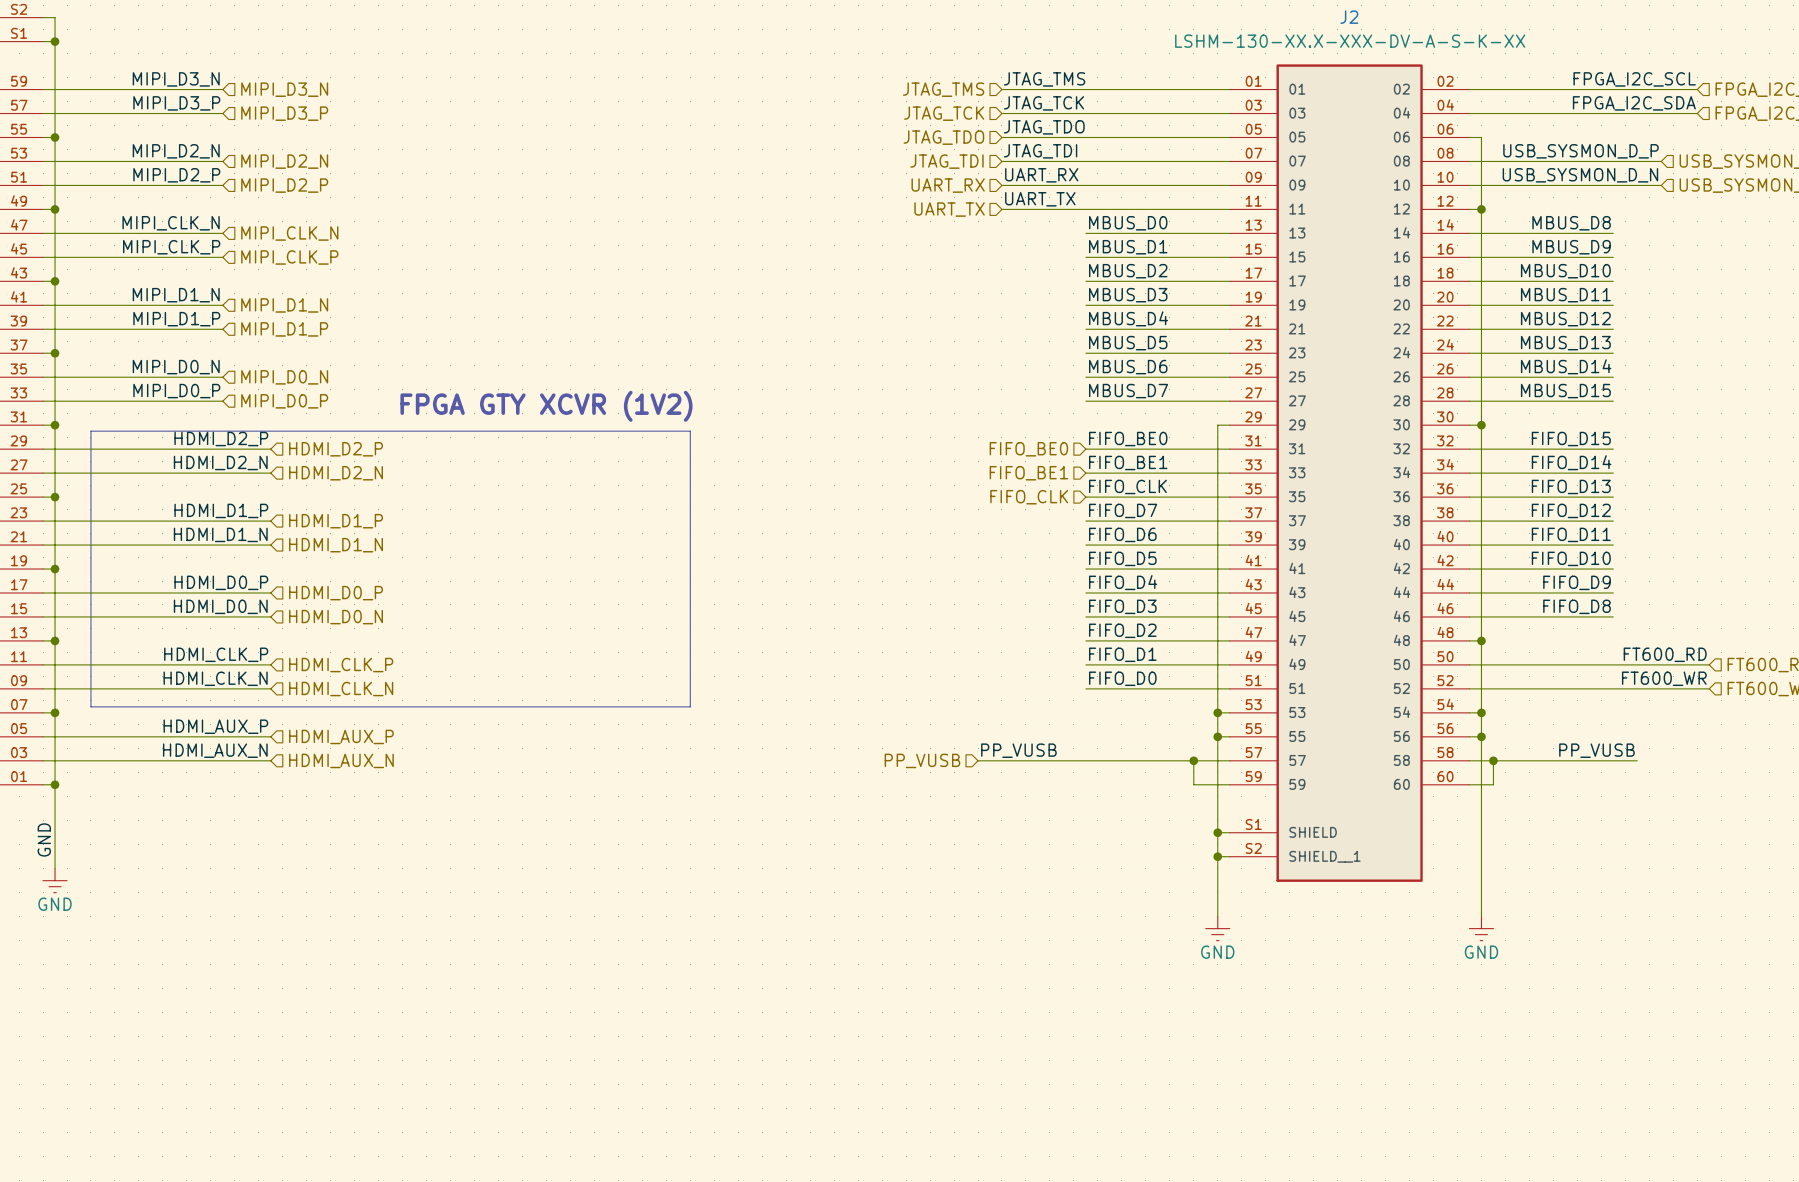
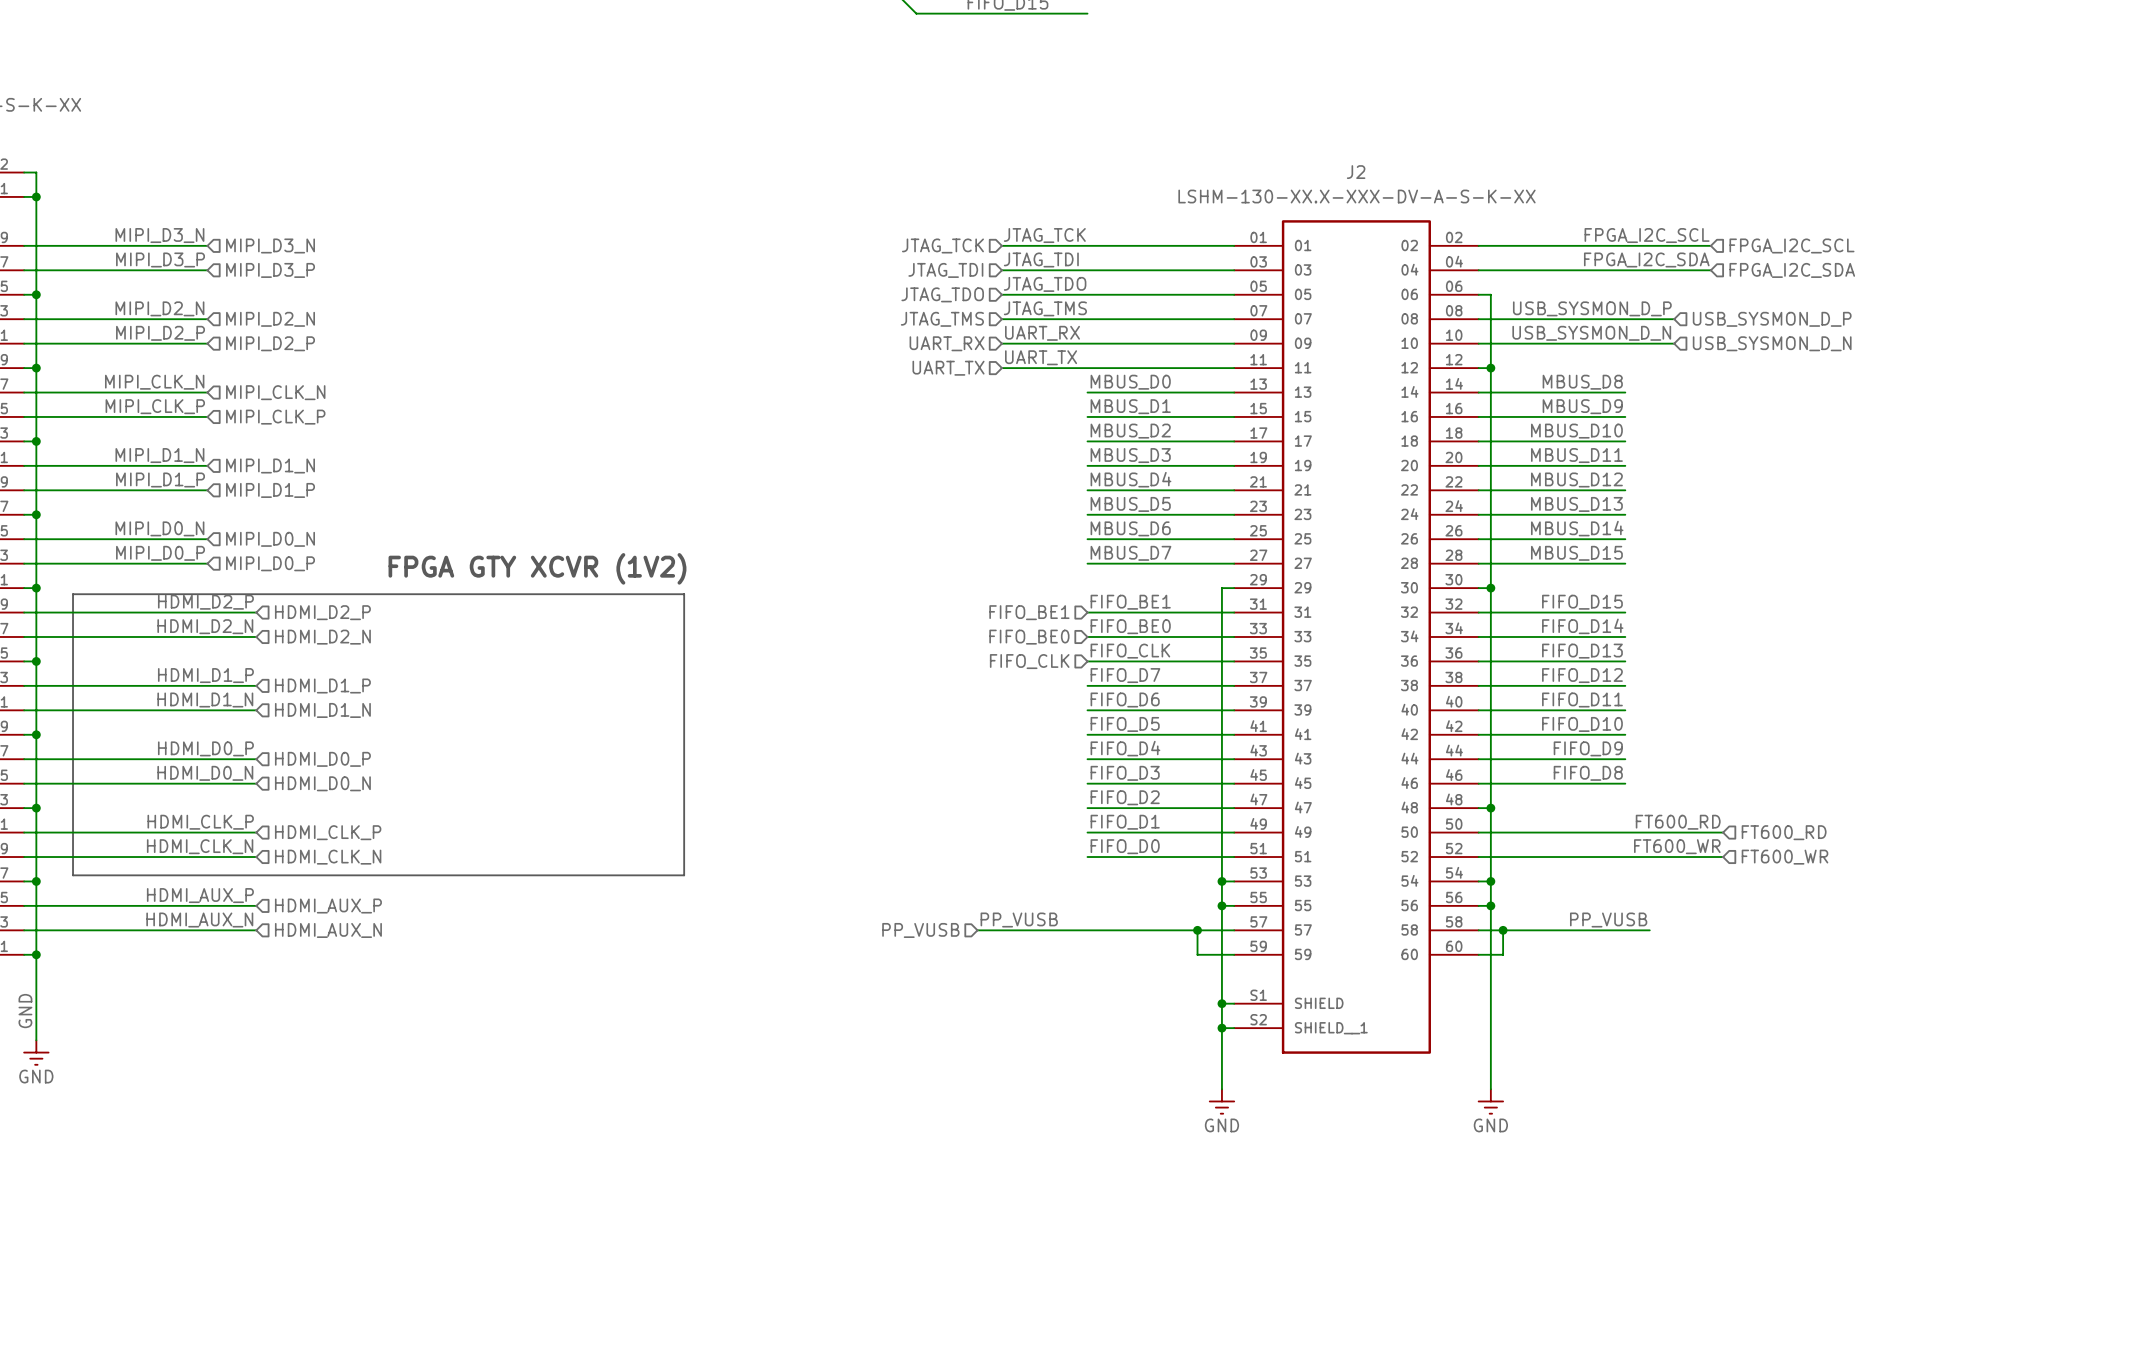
label: JTAG_TMS (1044, 79) -> JTAG_TCK (1044, 235)
hierarchical label: JTAG_TMS (943, 89) -> JTAG_TCK (942, 245)
label: JTAG_TCK (1044, 103) -> JTAG_TDI (1041, 259)
hierarchical label: JTAG_TCK (944, 113) -> JTAG_TDI (945, 270)
label: JTAG_TDI (1040, 151) -> JTAG_TMS (1045, 308)
hierarchical label: JTAG_TDI (947, 161) -> JTAG_TMS (942, 319)
label: FIFO_BE0 (1128, 439) -> FIFO_BE1 (1130, 602)
hierarchical label: FIFO_BE0 (1028, 449) -> FIFO_BE1 (1029, 612)
label: FIFO_BE1 (1128, 463) -> FIFO_BE0 (1130, 626)
hierarchical label: FIFO_BE1 (1028, 473) -> FIFO_BE0 (1029, 637)

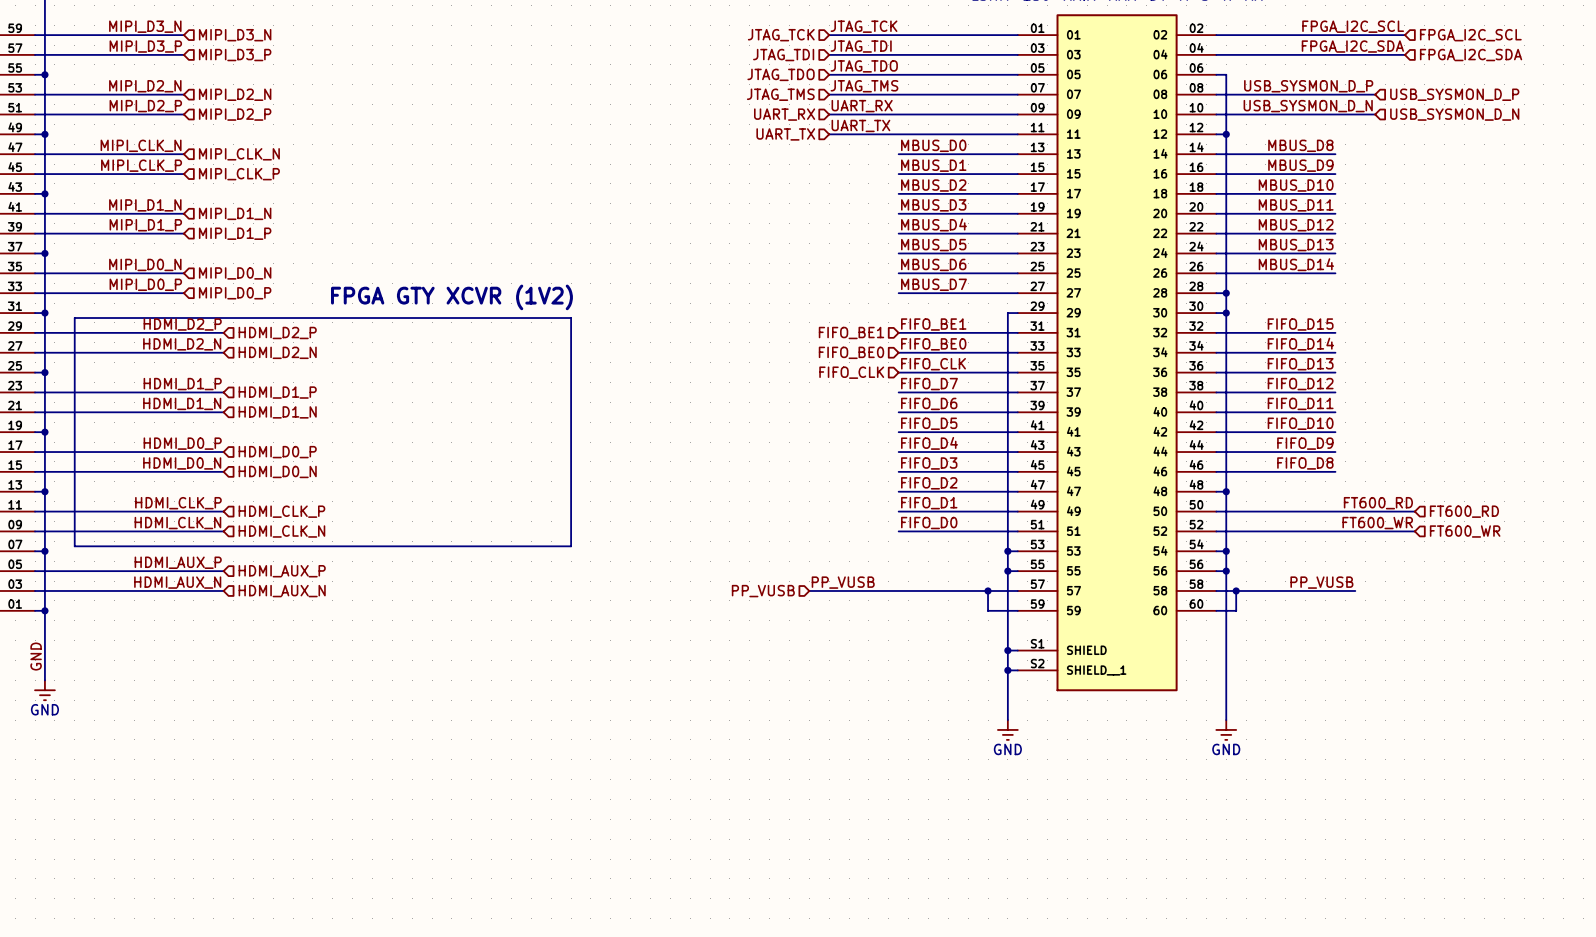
label: MBUS_D15 (1576, 553) -> none
wire: (1490, 563) (1625, 563) -> none
junction: none -> (1226, 293)

